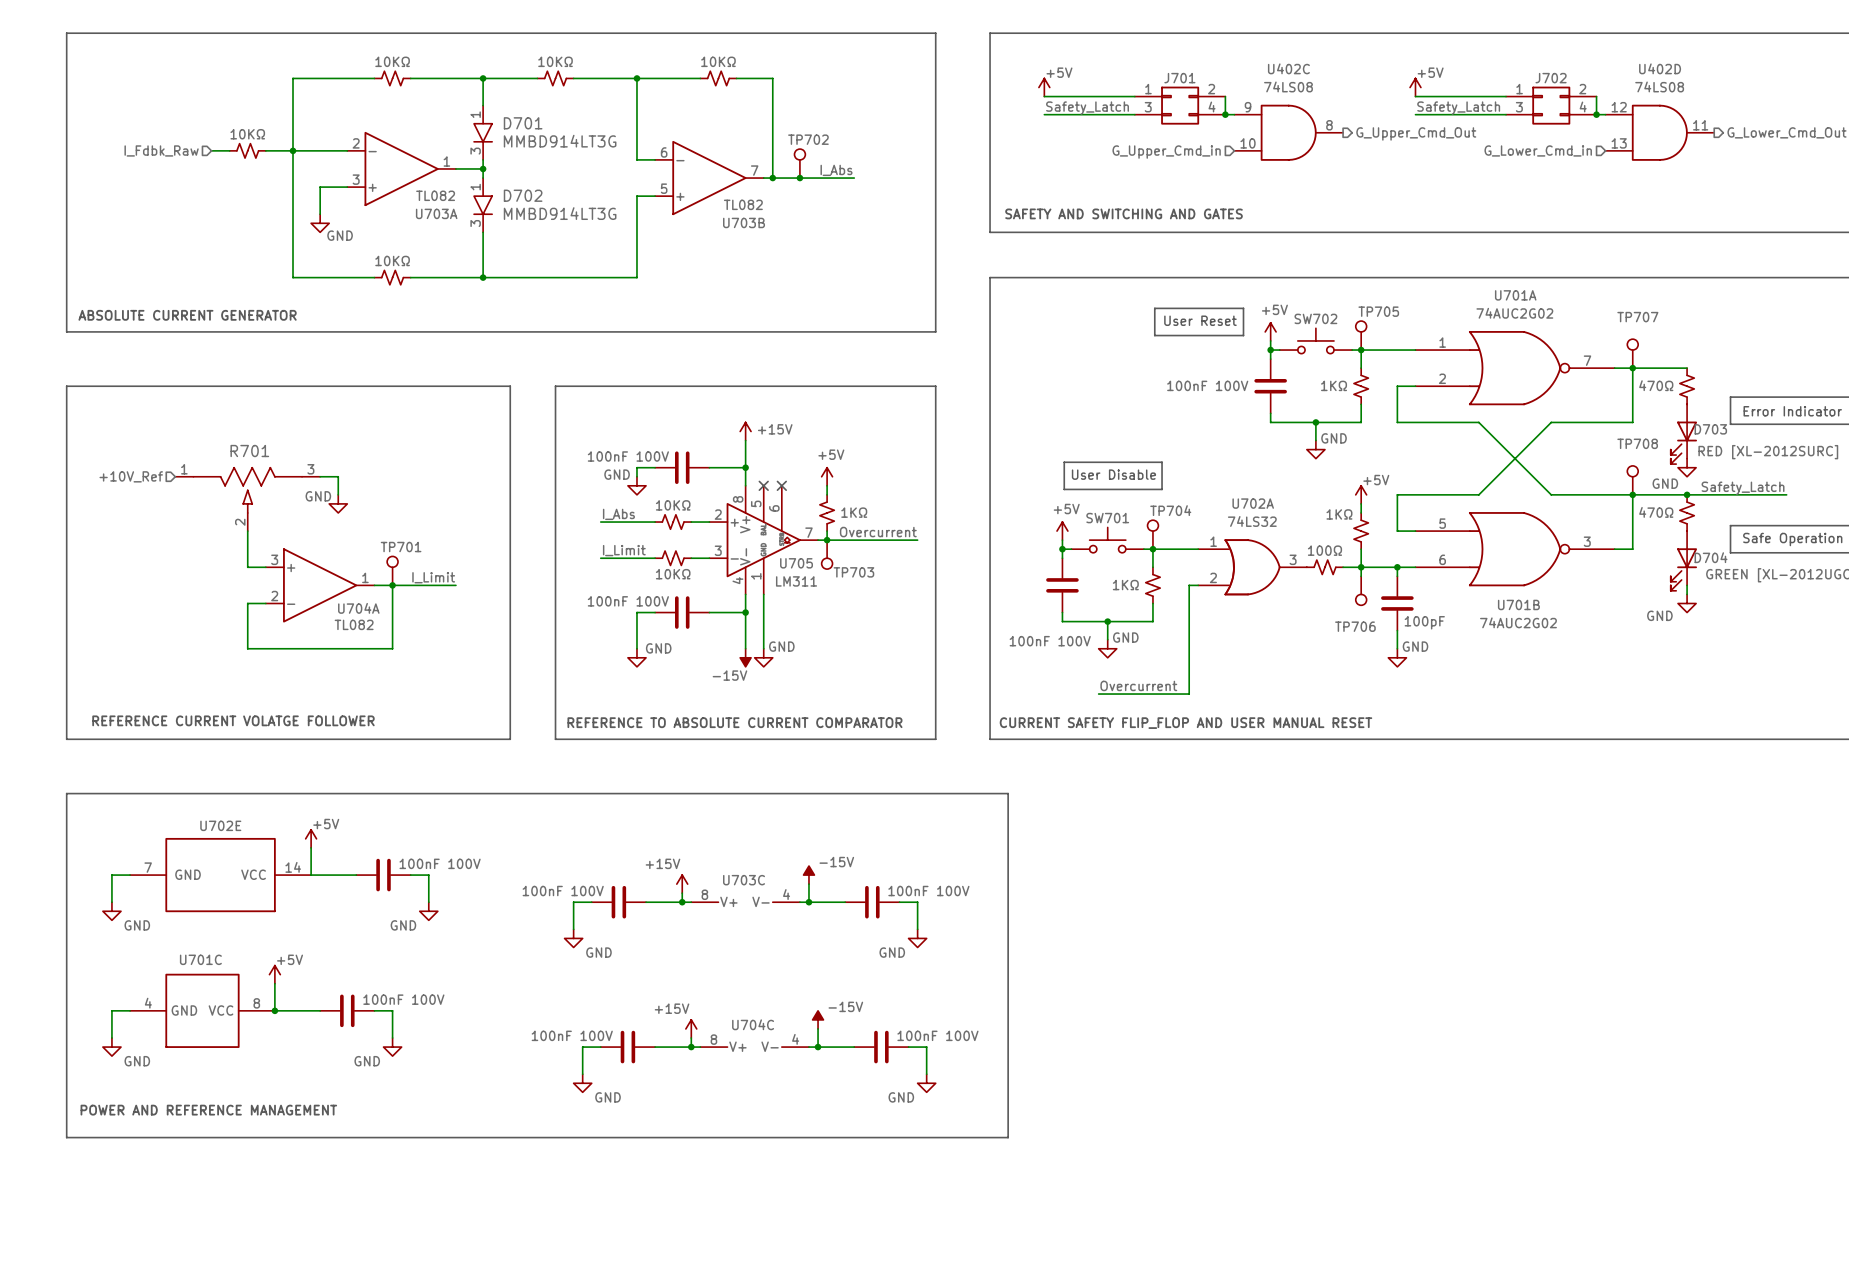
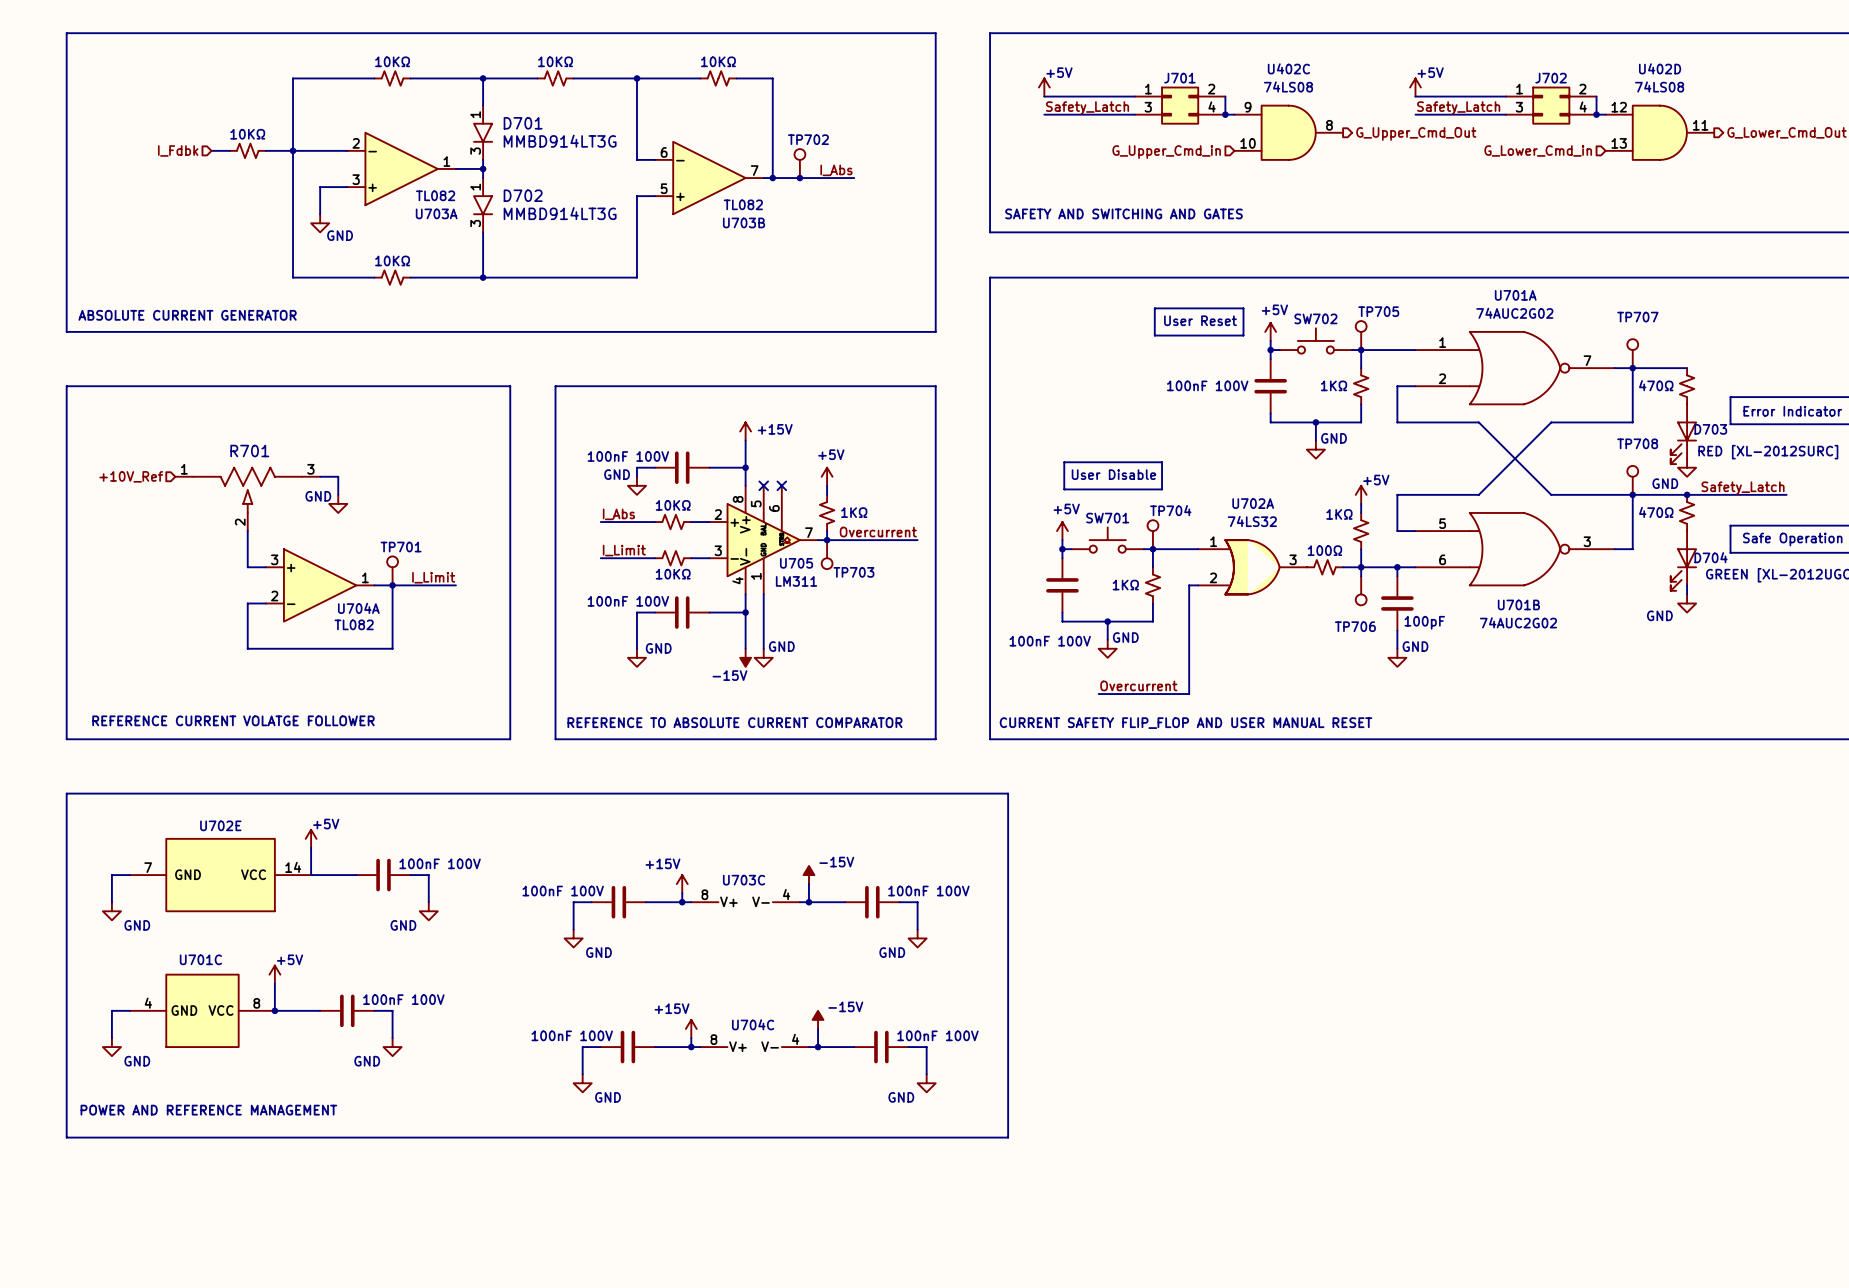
hierarchical label: I_Fdbk_Raw (161, 150) -> I_Fdbk (178, 150)

